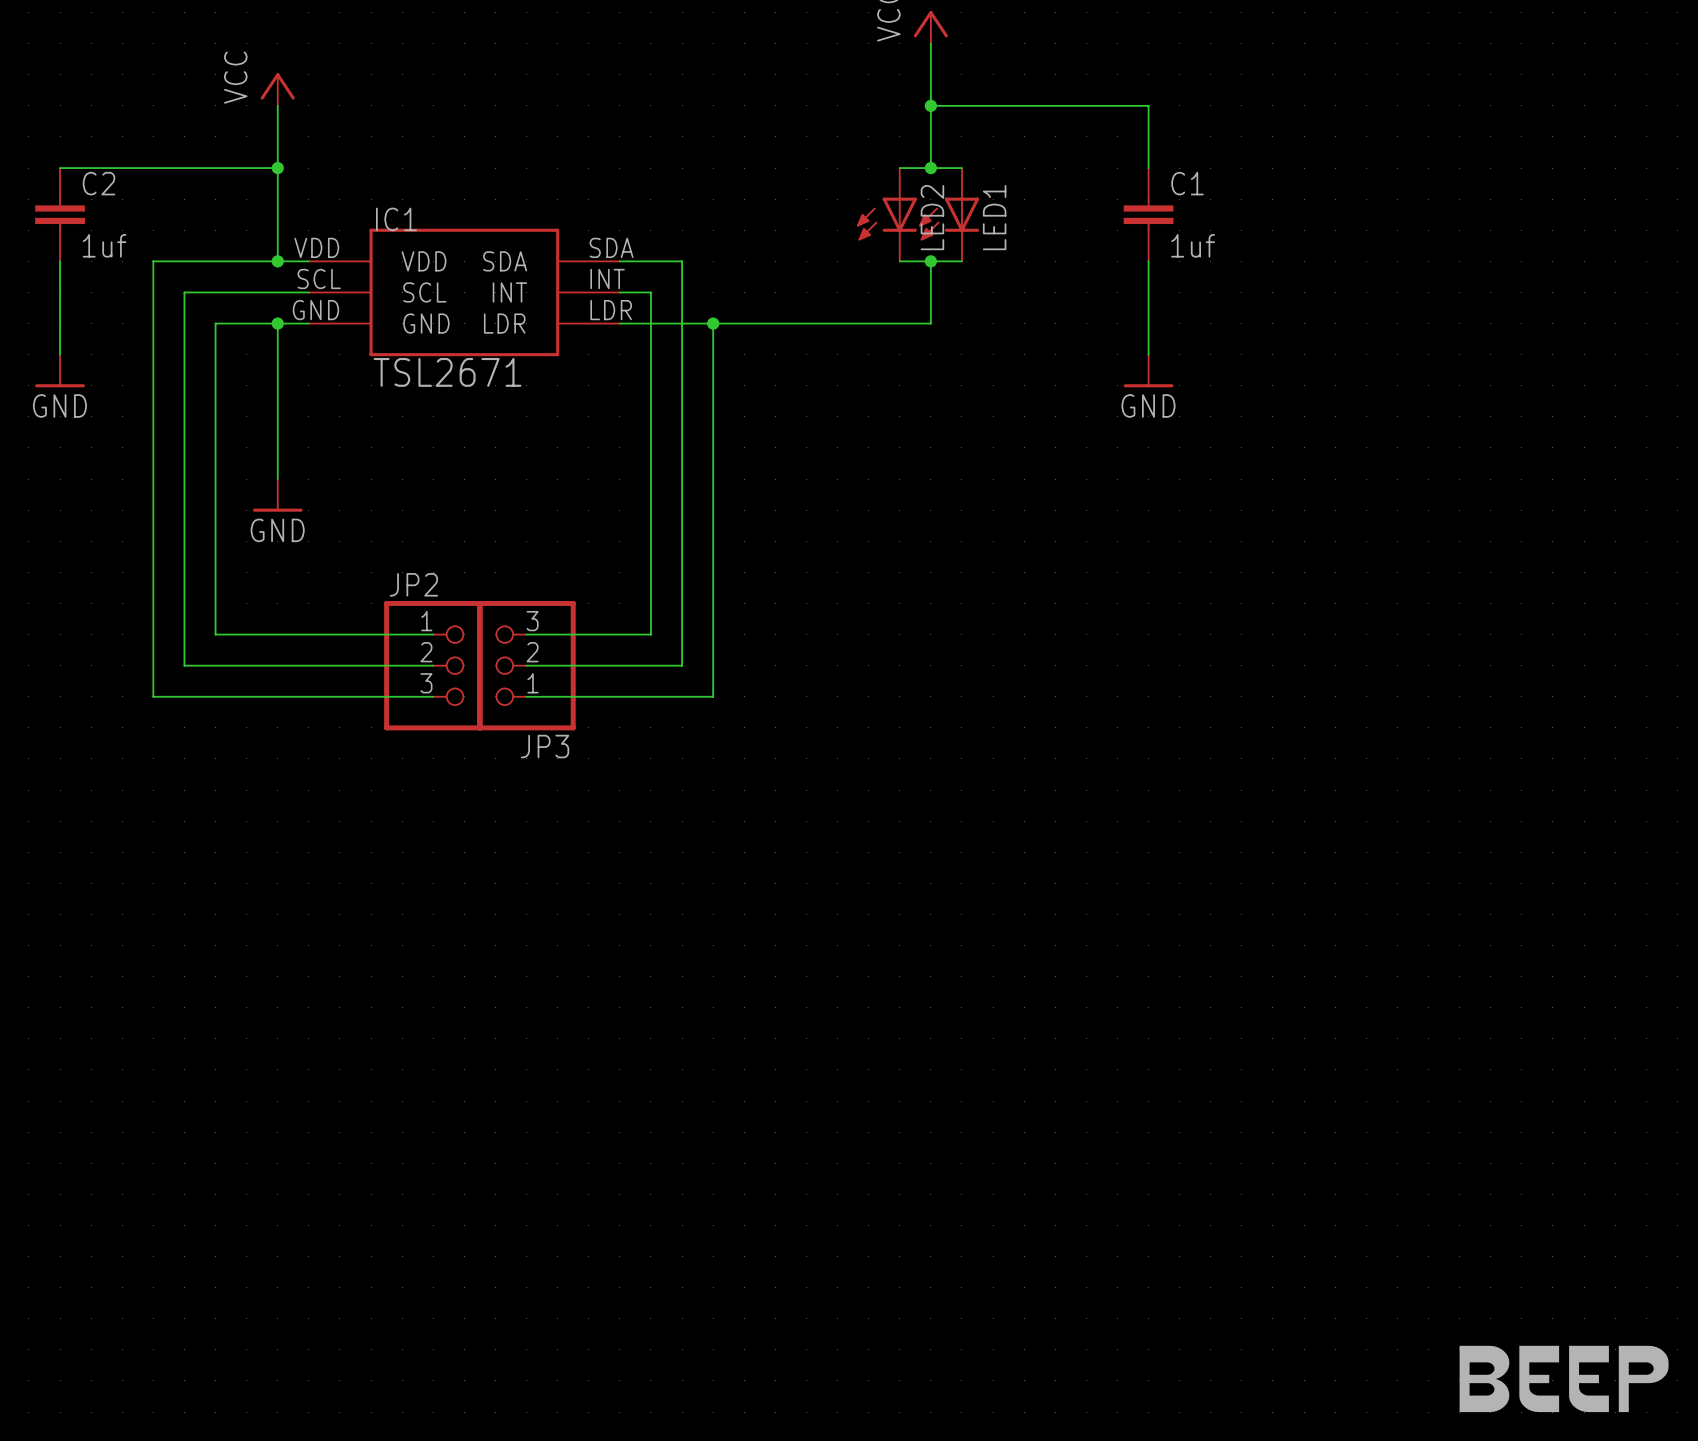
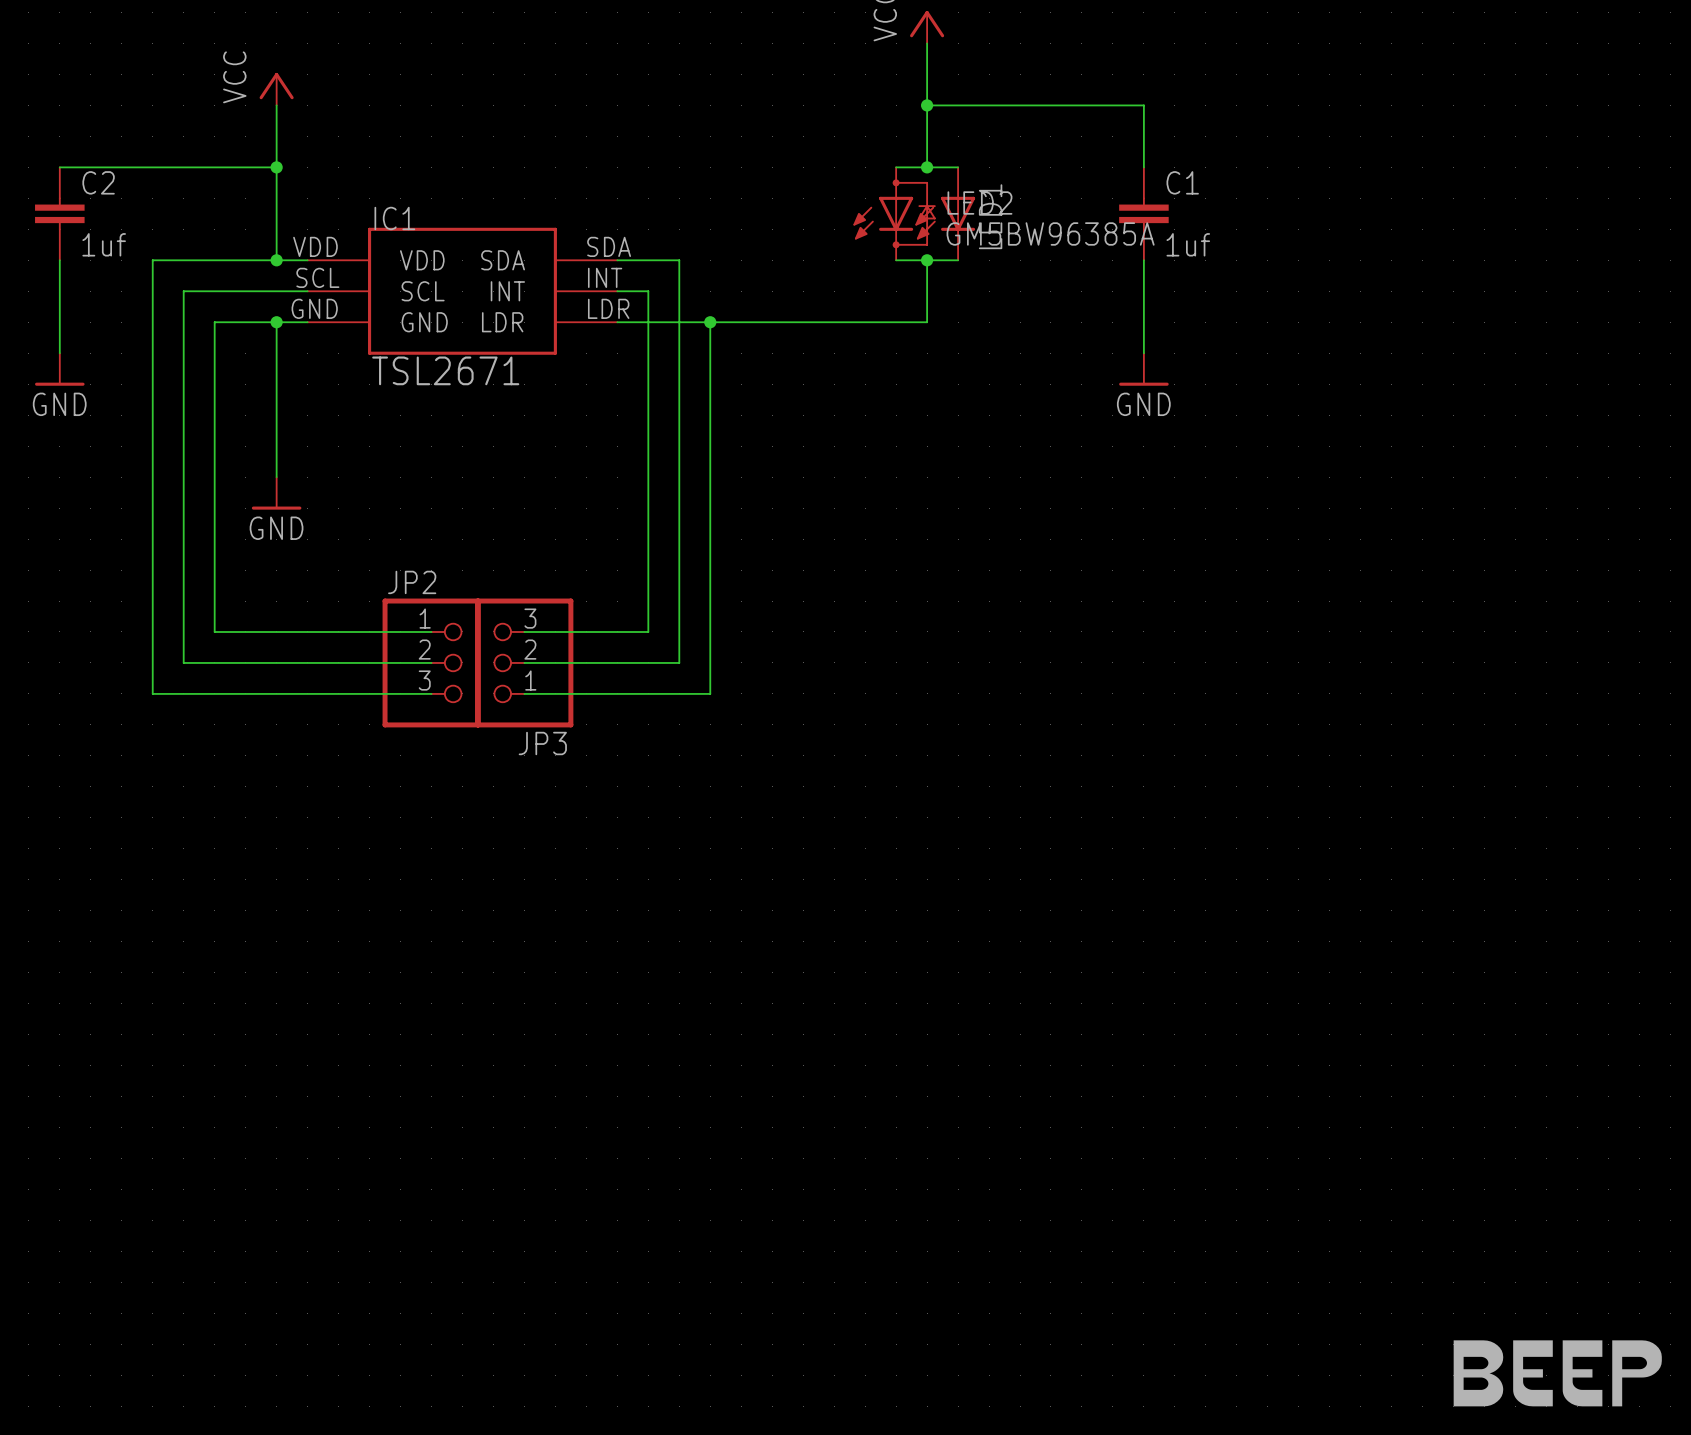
LED2 symbol: [856, 168, 917, 262] -> [853, 167, 936, 261]
LED2 name position: LED2 (932, 217) -> LED2 (979, 203)
LED2 value: none -> GM5BW96385A (1050, 233)

